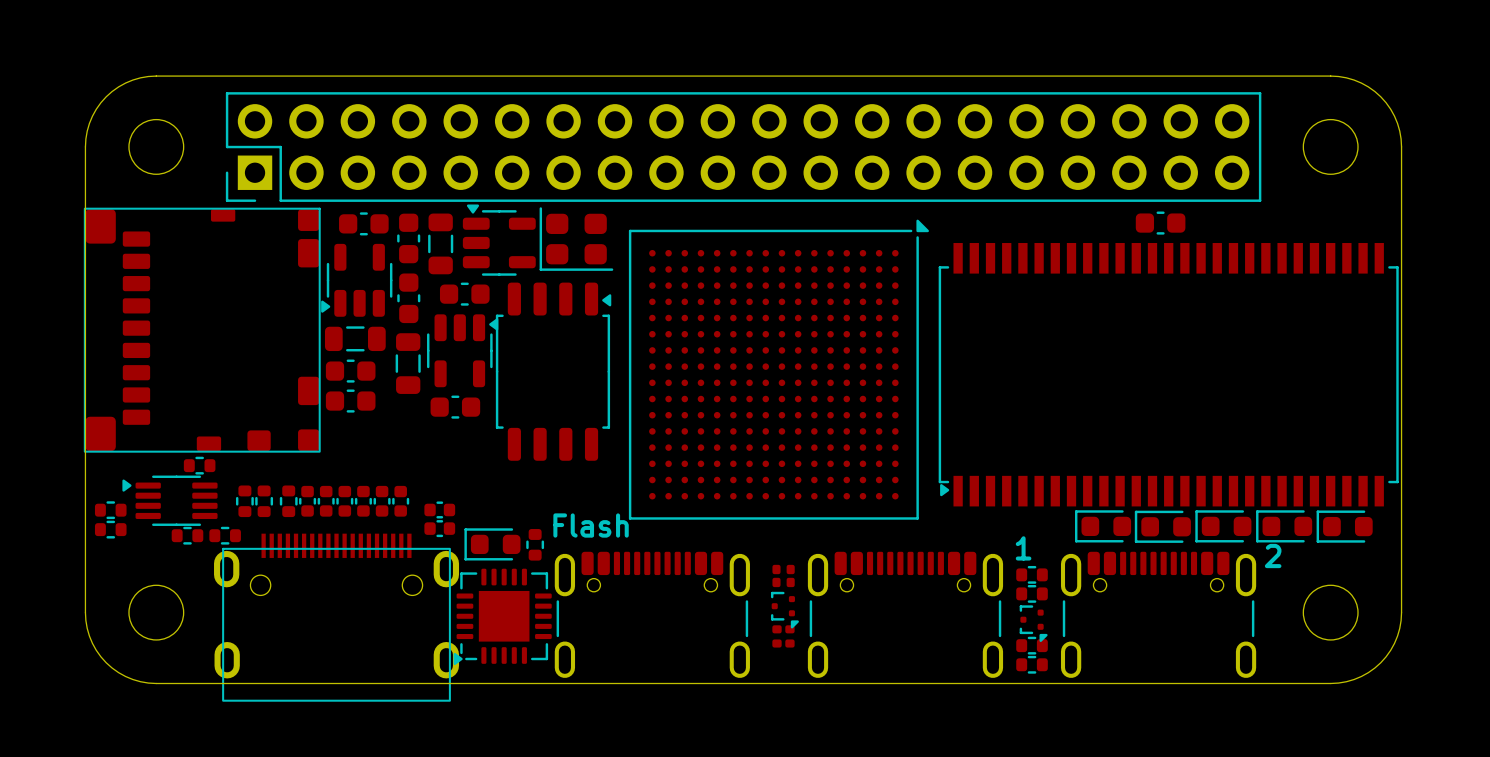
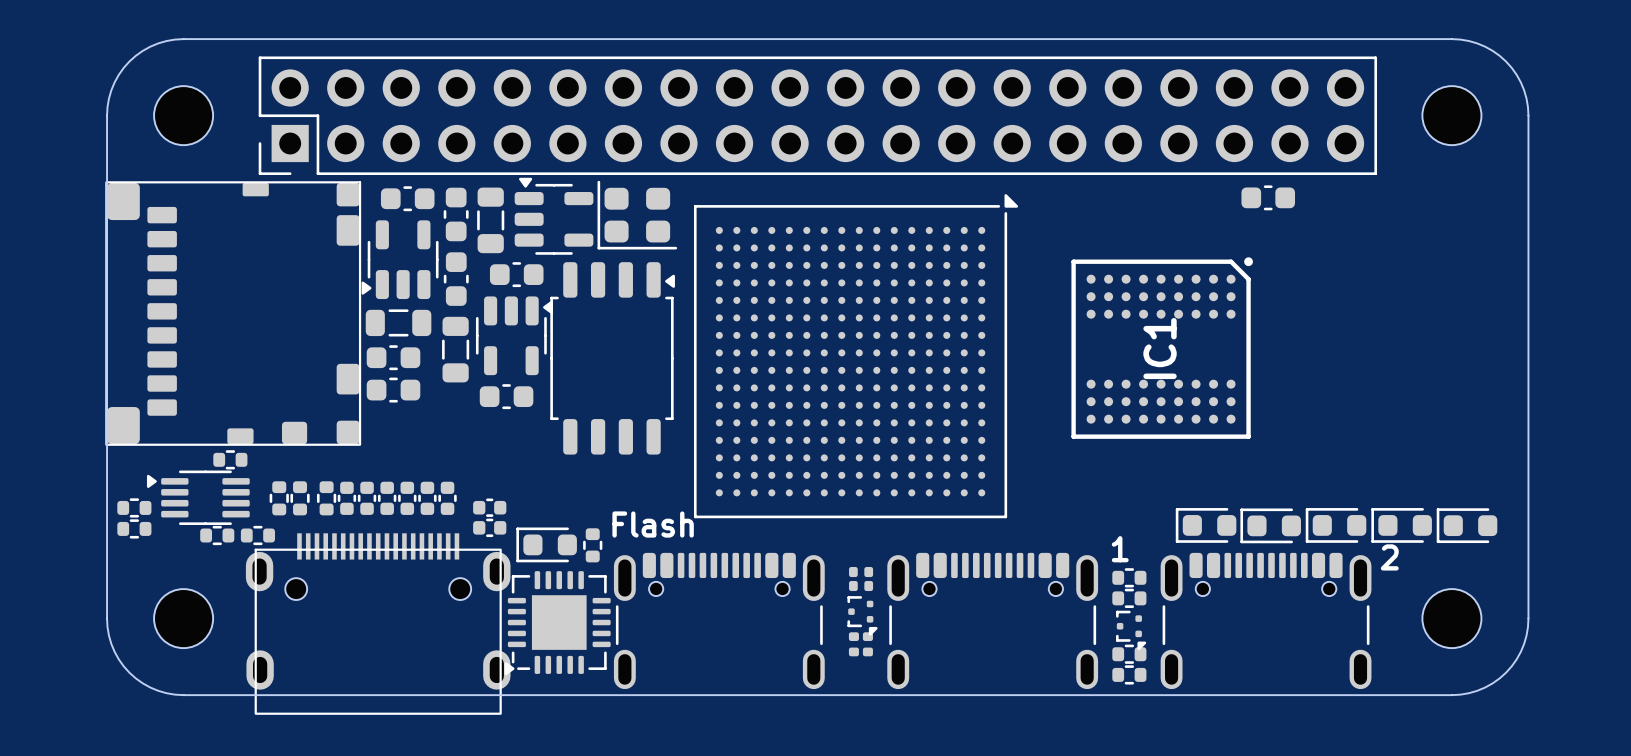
IC1: none -> (1162, 348)
part: (1168, 374) -> none

